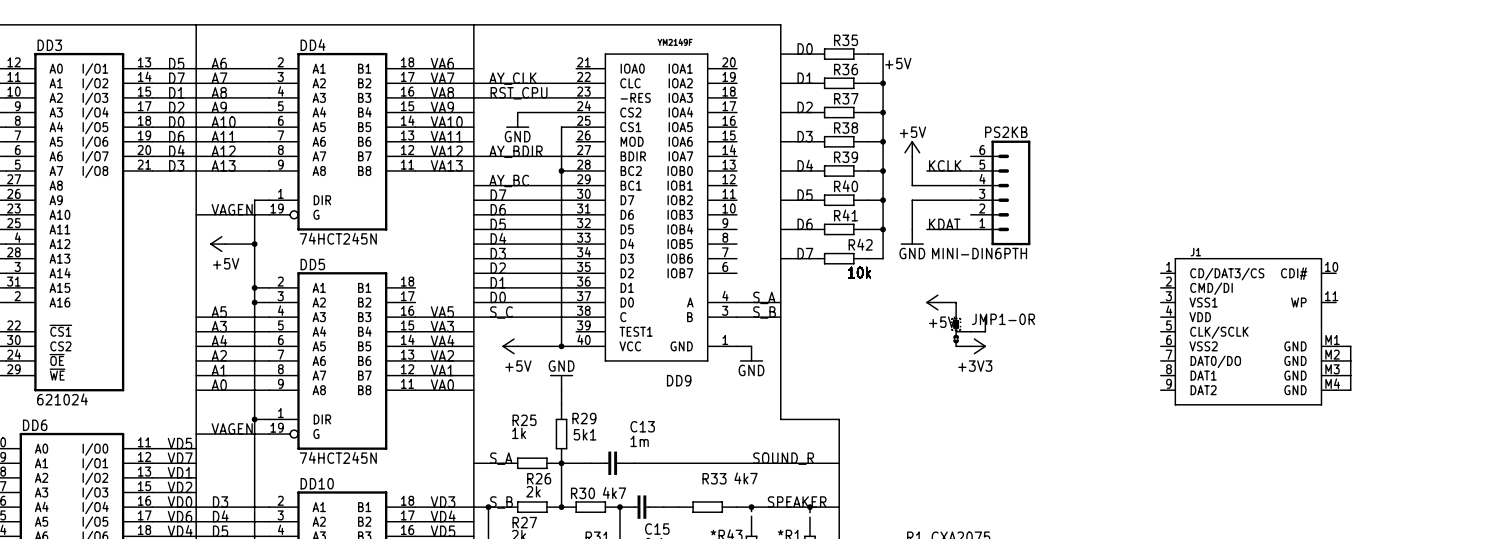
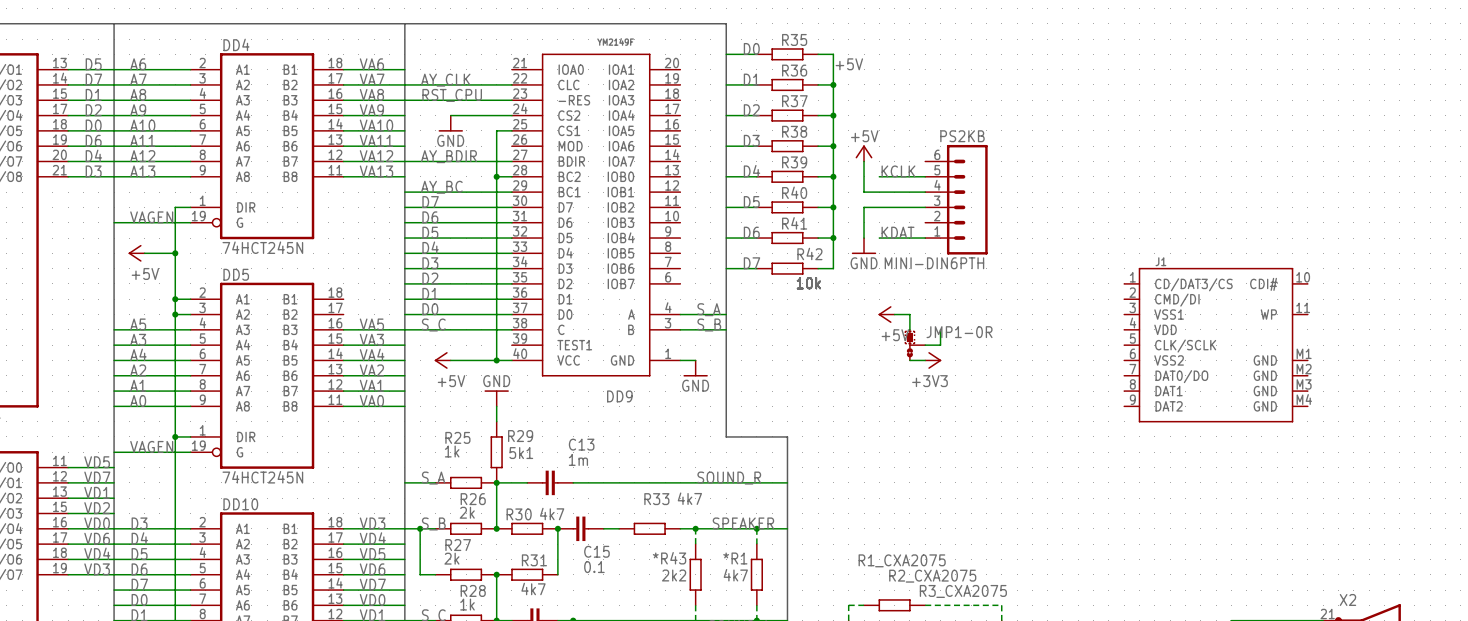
wire: (1336, 346) (1350, 346) (1350, 390) (1336, 390) -> none
wire: (1336, 360) (1350, 360) -> none
wire: (1336, 375) (1350, 375) -> none

